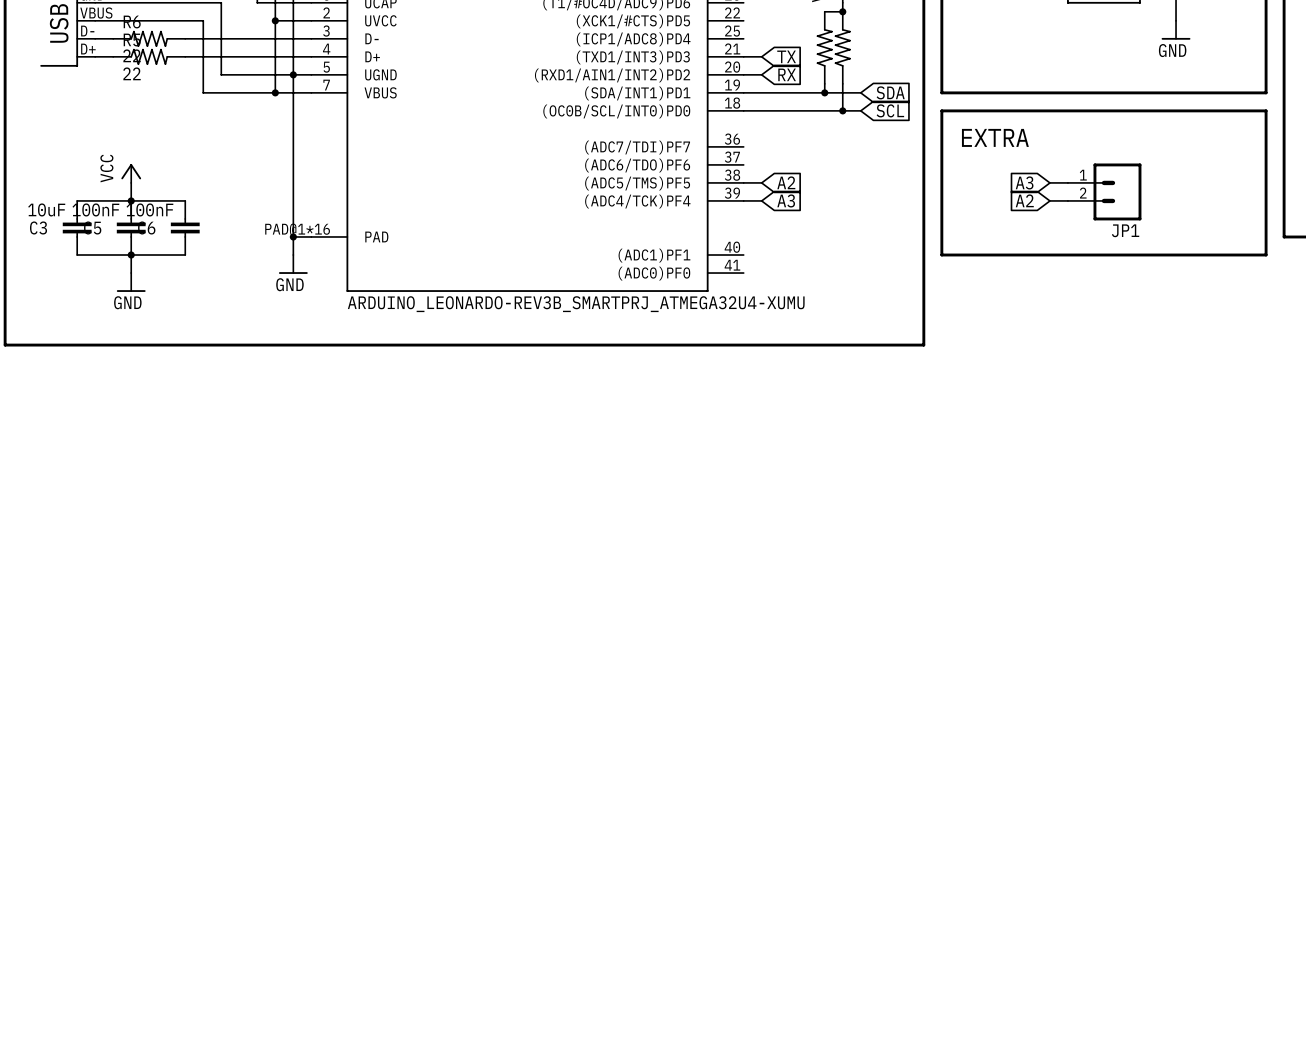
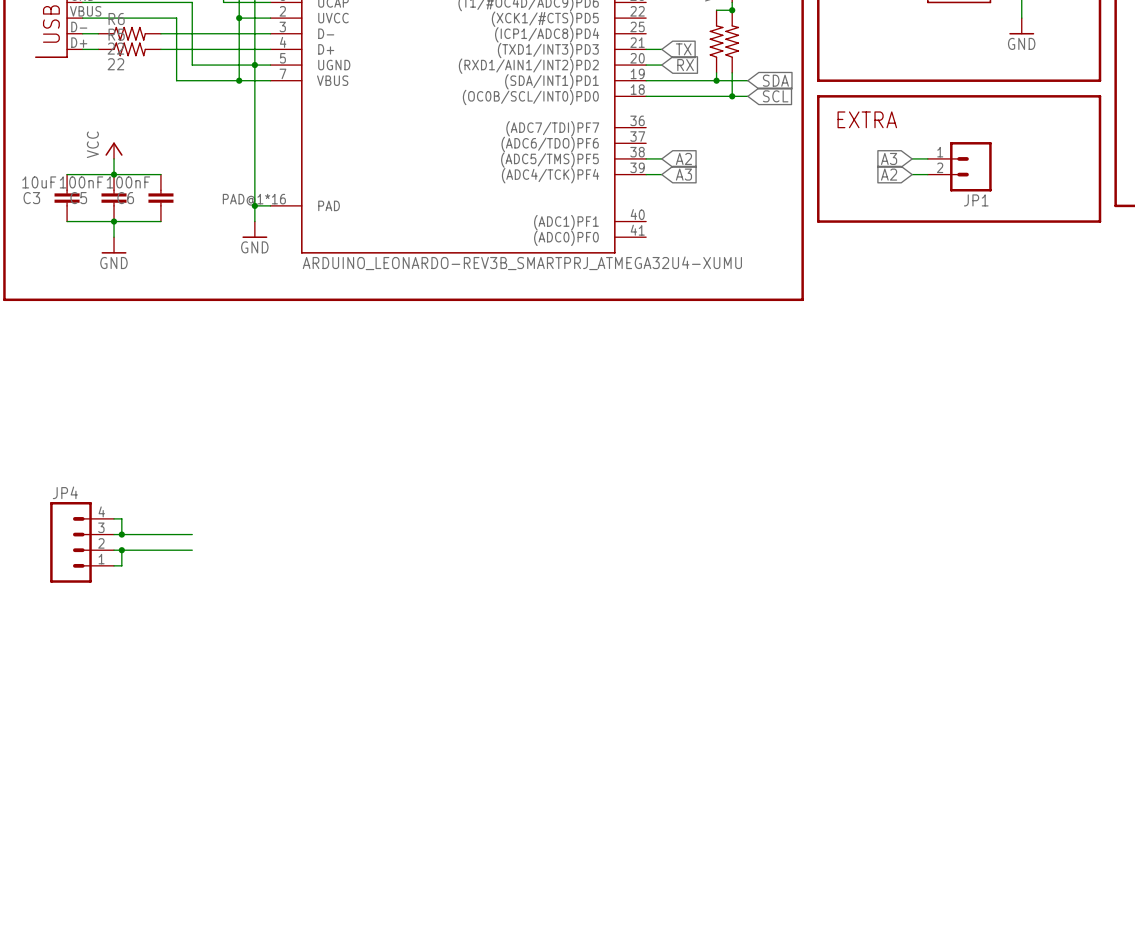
wire: none -> (114, 518) (121, 518) (121, 534)
wire: none -> (114, 534) (192, 534)
junction: none -> (121, 534)
JP4: none -> (82, 542)
wire: none -> (114, 550) (192, 550)
wire: none -> (121, 550) (121, 565) (114, 565)
junction: none -> (121, 550)

